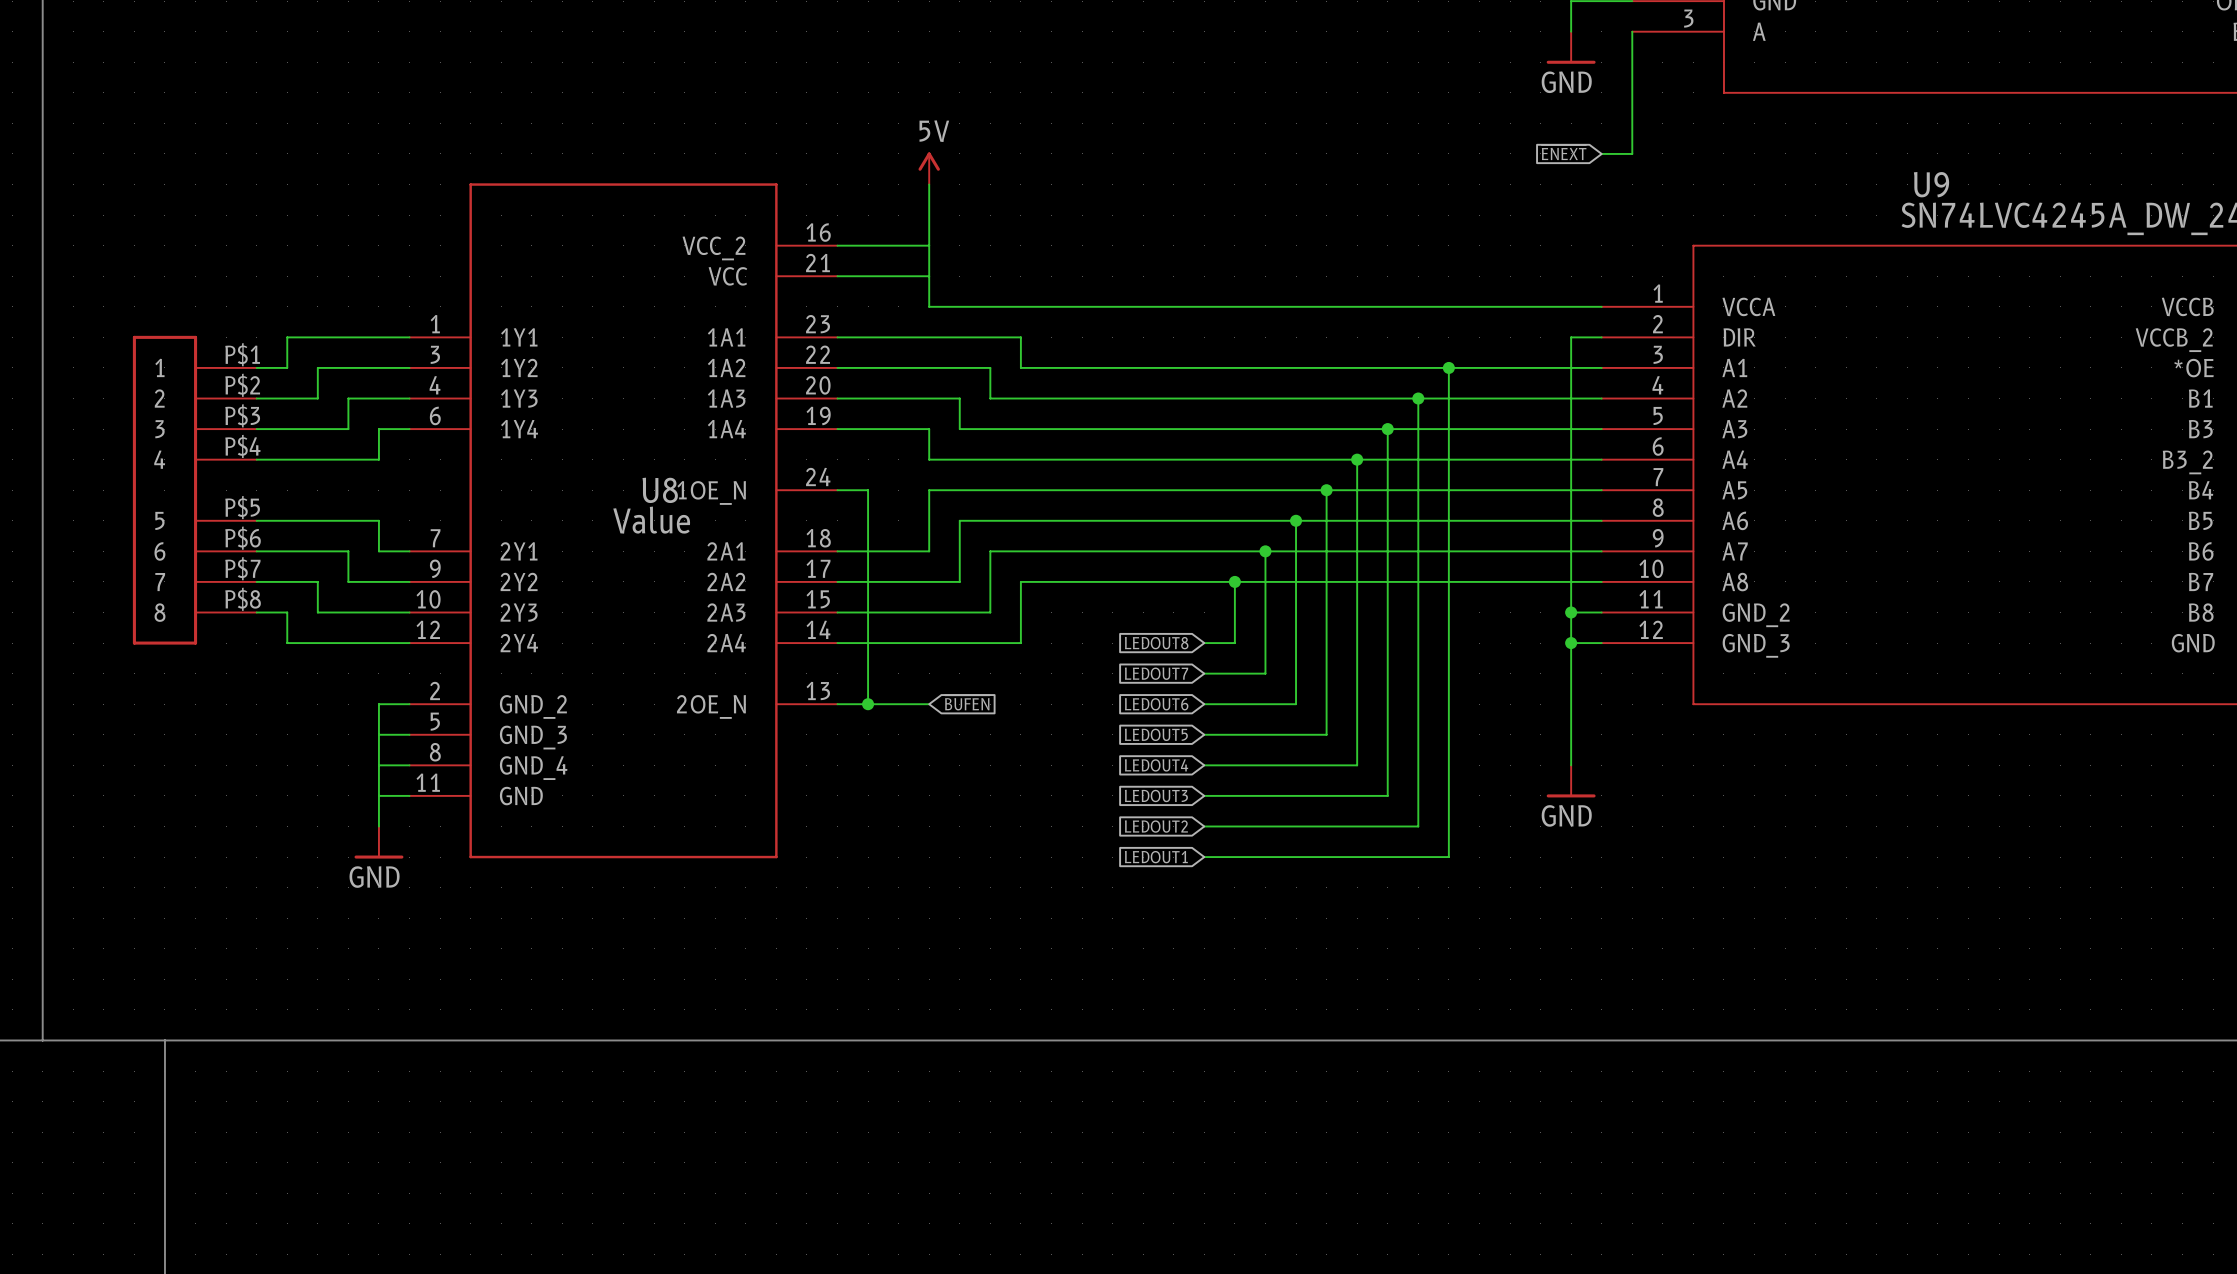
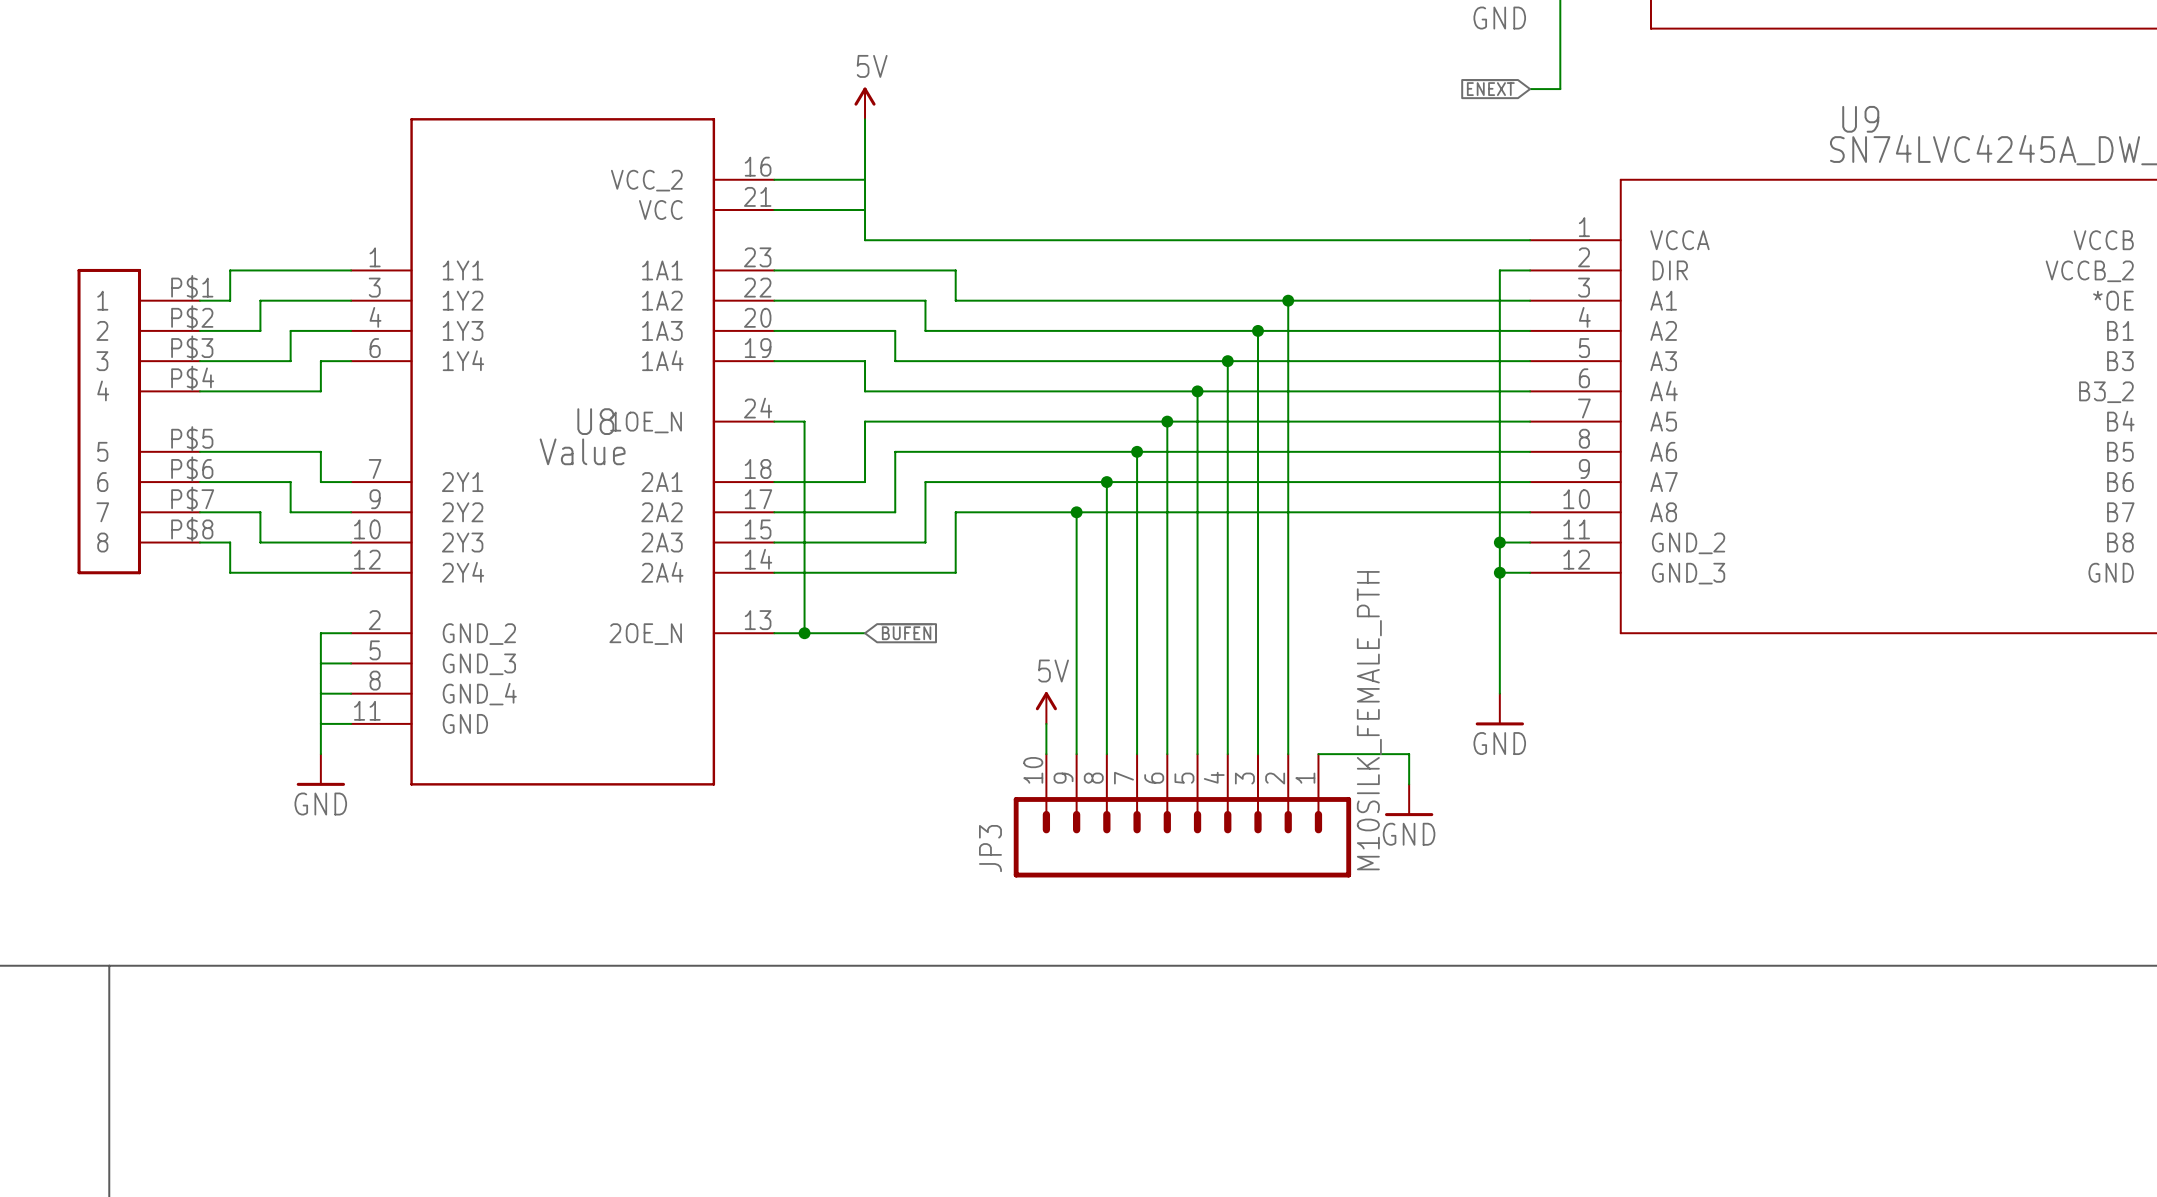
wire: none -> (1288, 300) (1288, 391)
junction: none -> (1288, 300)
wire: (1448, 367) (1448, 857) (1204, 857) -> none
junction: (1448, 367) -> none
wire: none -> (1258, 330) (1258, 421)
junction: none -> (1258, 330)
wire: (1418, 398) (1418, 826) -> (1409, 784) (1409, 754) (1348, 754)
junction: (1418, 398) -> none
wire: none -> (1227, 361) (1227, 451)
junction: none -> (1227, 361)
wire: (1387, 429) (1387, 795) (1204, 795) -> none
junction: (1387, 429) -> none
wire: none -> (1197, 391) (1197, 482)
junction: none -> (1197, 391)
junction: (1357, 459) -> none
wire: none -> (1167, 421) (1167, 512)
junction: none -> (1167, 421)
junction: (1326, 490) -> none
junction: none -> (1137, 451)
junction: (1296, 520) -> none
wire: none -> (1106, 482) (1106, 754)
junction: none -> (1106, 482)
junction: (1265, 551) -> none
wire: none -> (1076, 512) (1076, 754)
junction: none -> (1076, 512)
junction: (1234, 581) -> none
global label: LEDOUT8 (1156, 643) -> none
wire: (1204, 643) (1234, 643) -> (1167, 754) (1167, 572)
global label: LEDOUT7 (1156, 673) -> none
wire: (1204, 673) (1265, 673) -> (1197, 754) (1197, 602)
global label: LEDOUT6 (1156, 704) -> none
wire: (1204, 704) (1296, 704) -> (1227, 754) (1227, 633)
global label: LEDOUT5 (1156, 734) -> none
wire: (1204, 734) (1326, 734) -> (1258, 754) (1258, 663)
global label: LEDOUT4 (1156, 765) -> none
wire: (1204, 765) (1357, 765) -> (1288, 754) (1288, 693)
power symbol: none -> 5V (1046, 708)
wire: none -> (1046, 723) (1046, 754)
global label: LEDOUT3 (1156, 795) -> none
global label: LEDOUT2 (1156, 826) -> none
wire: (1204, 826) (1387, 826) -> (1137, 754) (1137, 451)
global label: LEDOUT1 (1156, 857) -> none
power symbol: none -> GND (1409, 800)
JP3: none -> M10SILK_FEMALE_PTH (1182, 815)

